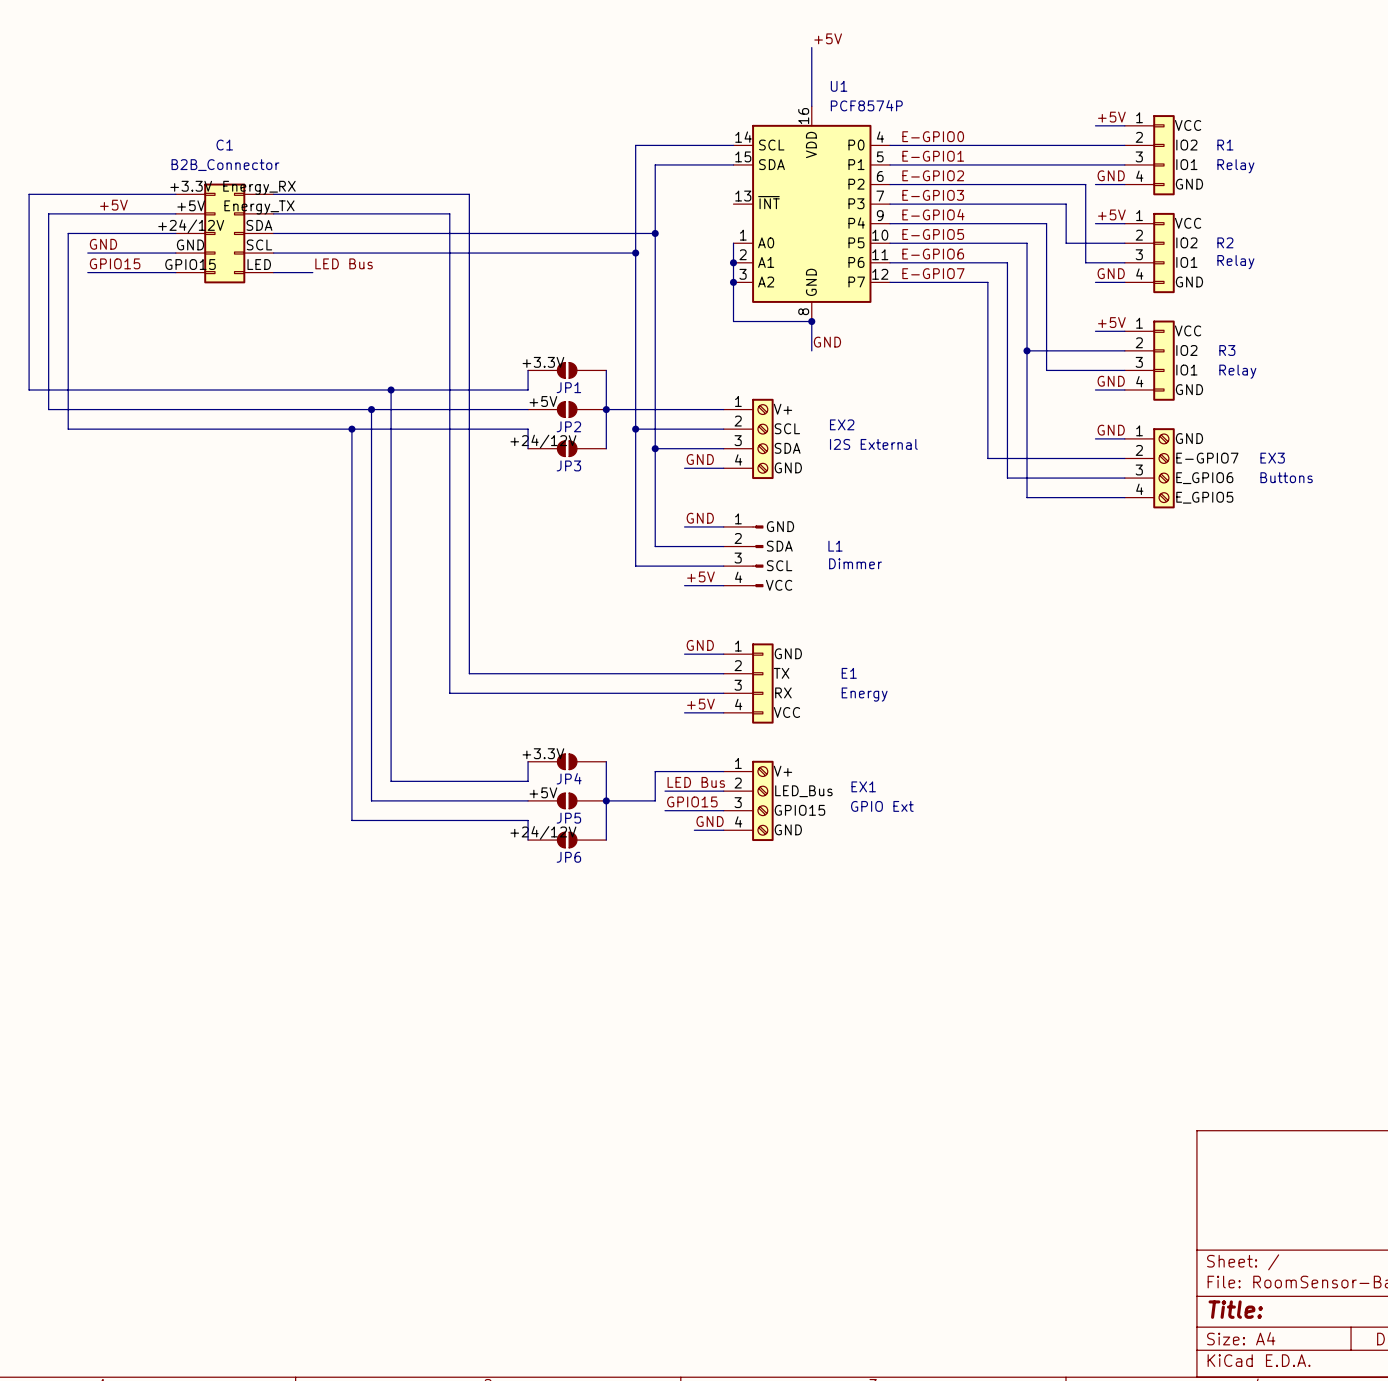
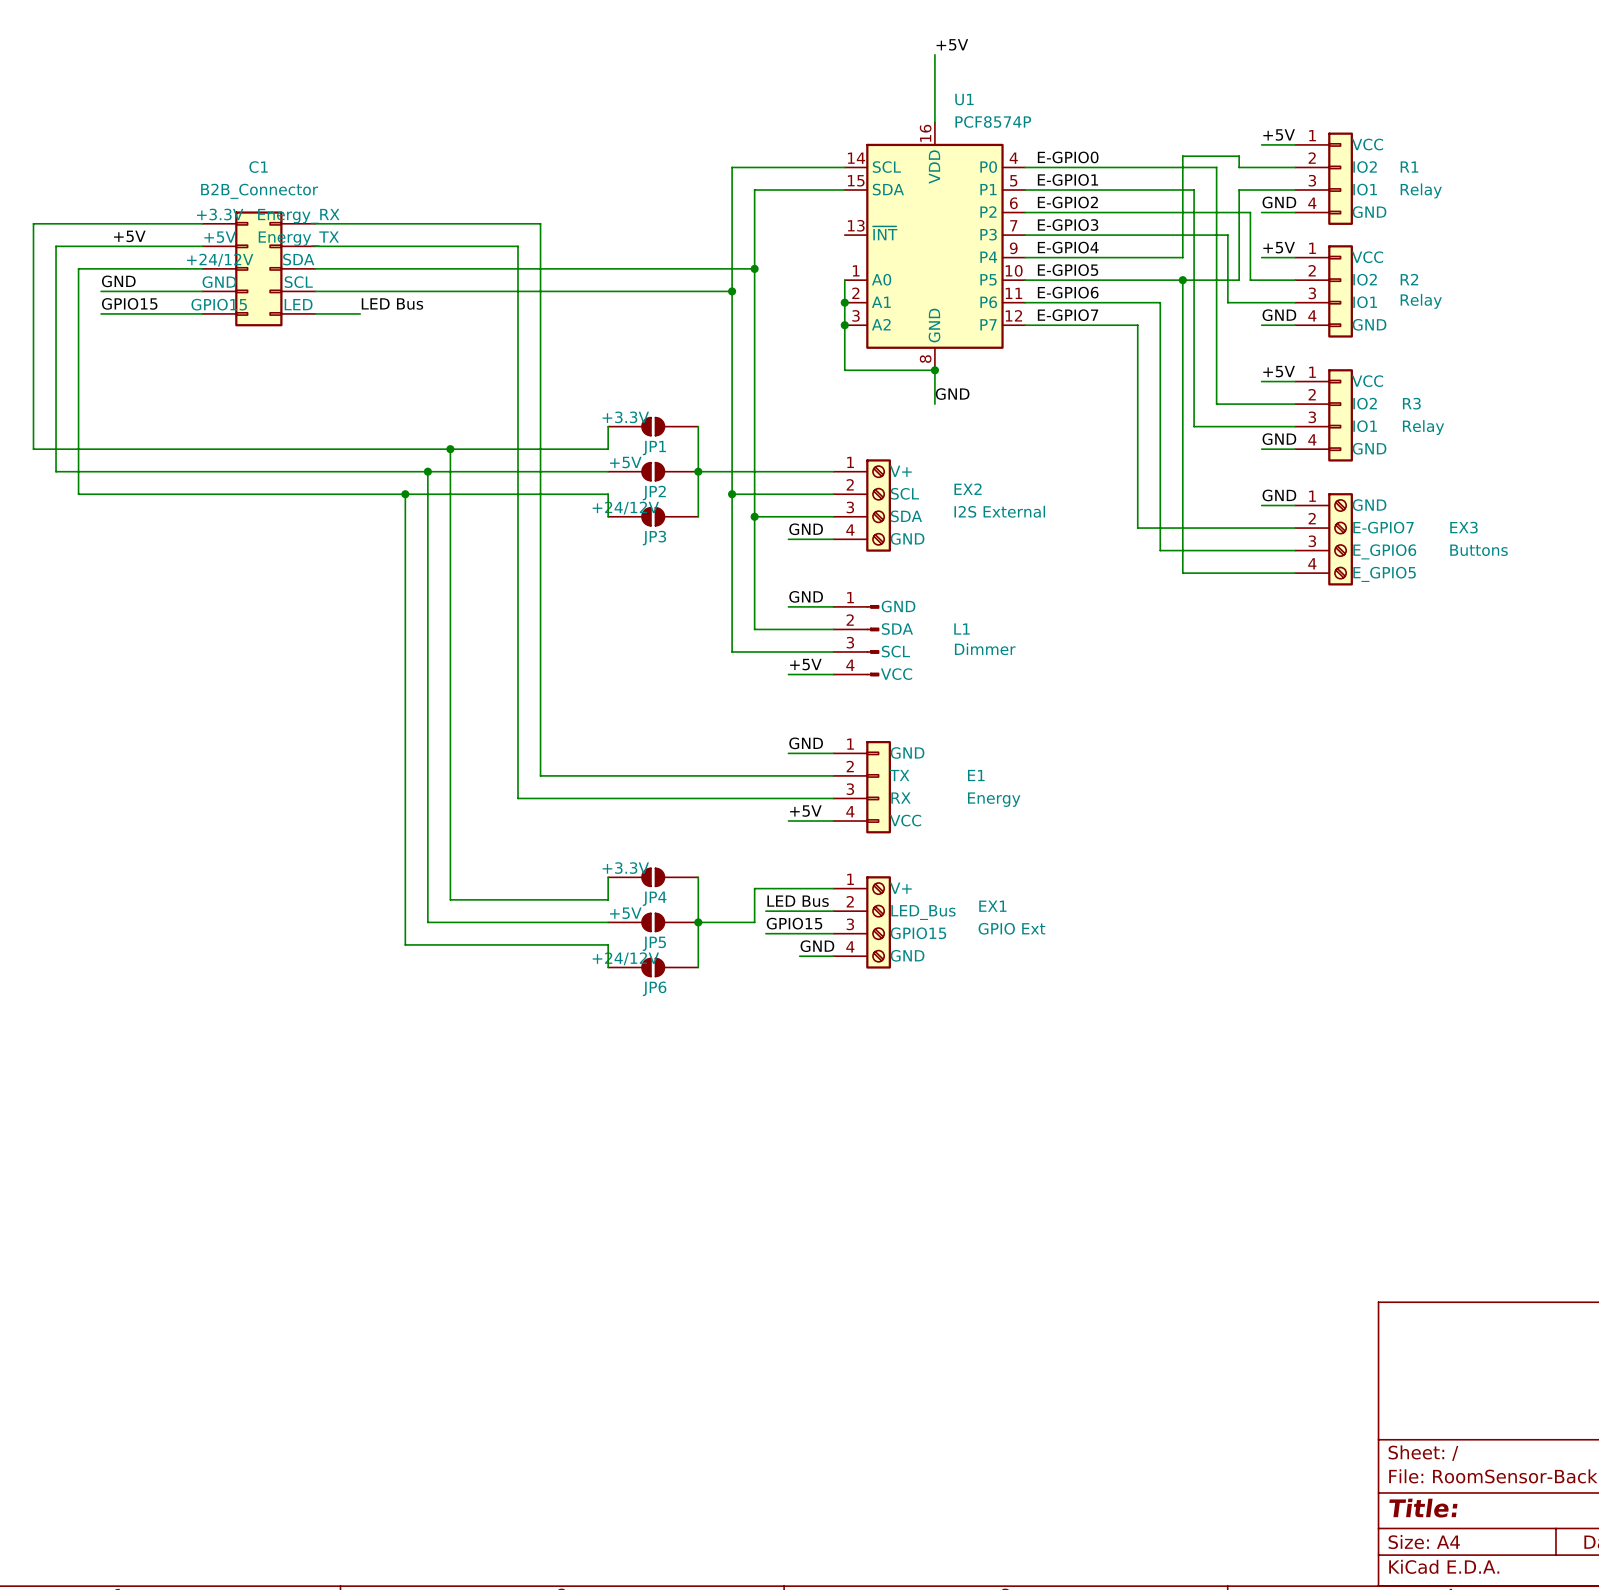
wire: (1056, 145) (1075, 145) -> (1182, 257) (1182, 156) (1239, 156) (1239, 167)
wire: (1036, 164) (1075, 164) -> (1239, 280) (1239, 190)
wire: (1027, 223) (1046, 223) (1046, 370) -> (1194, 190) (1194, 426) (1205, 426)
junction: none -> (1182, 280)
wire: (1075, 243) (1085, 243) (1085, 262) -> (1182, 280) (1227, 280) (1227, 302) (1250, 302)
wire: (1027, 350) (1056, 350) -> (1216, 167) (1216, 404)
junction: (1027, 350) -> none

